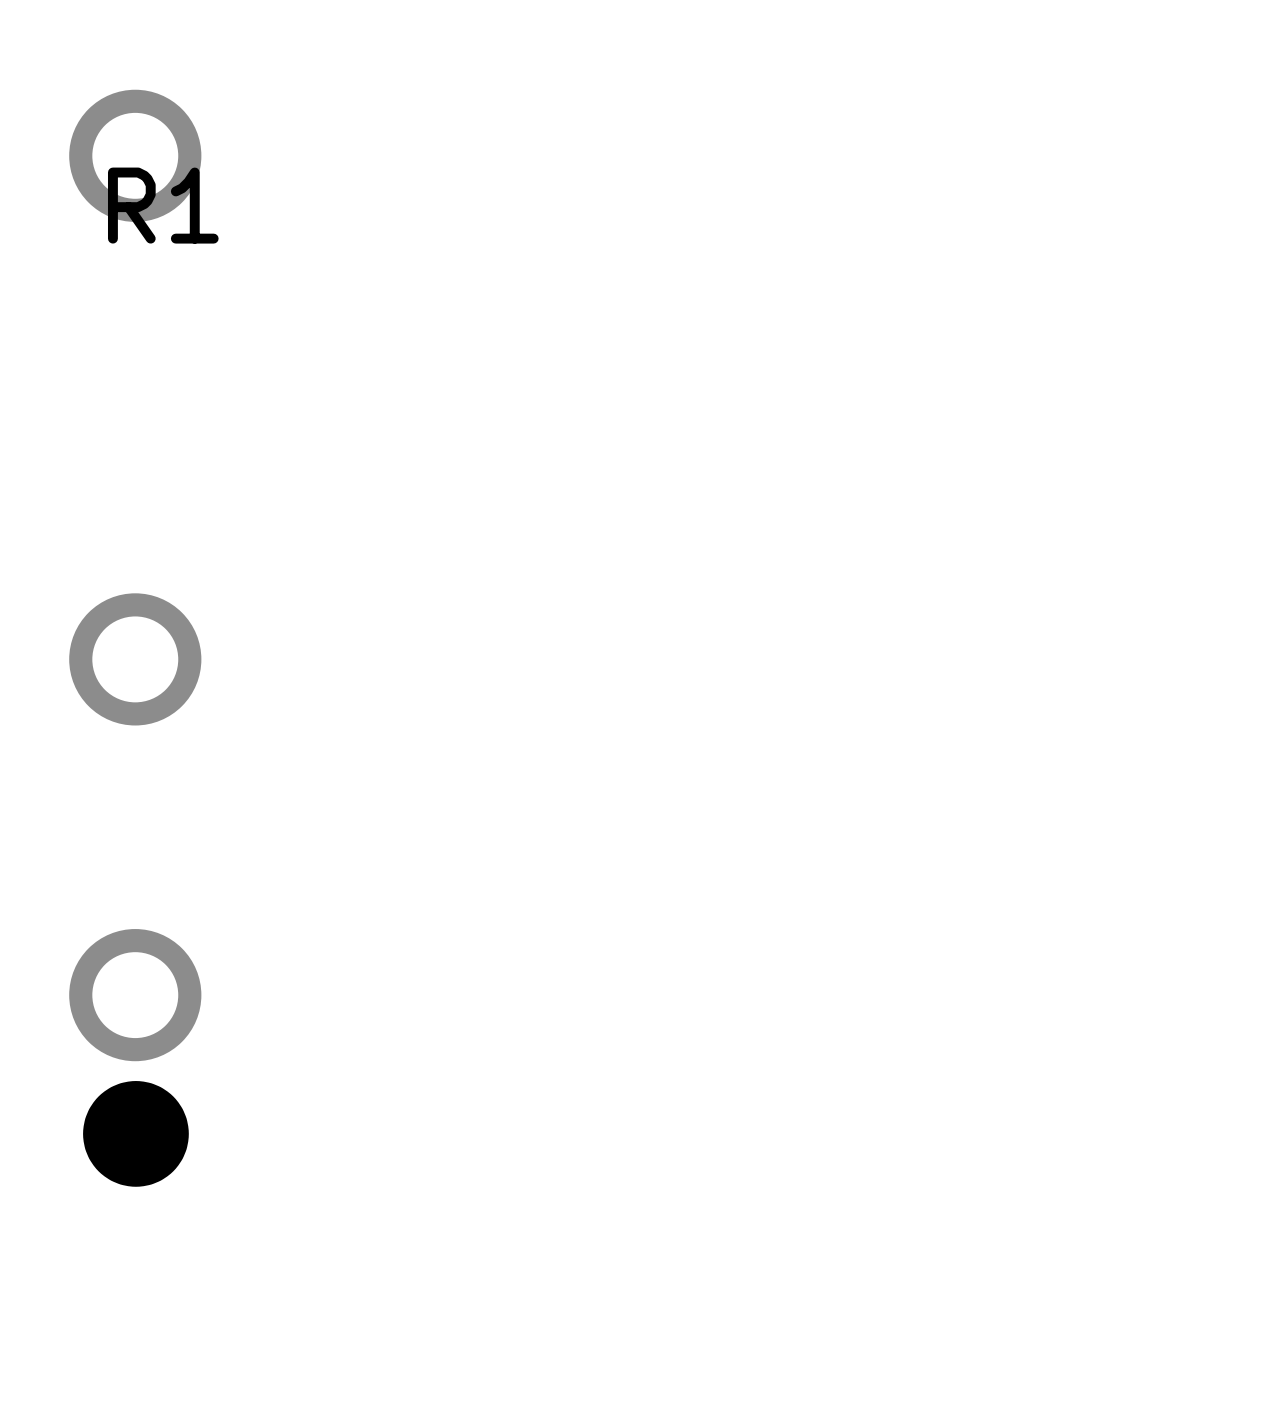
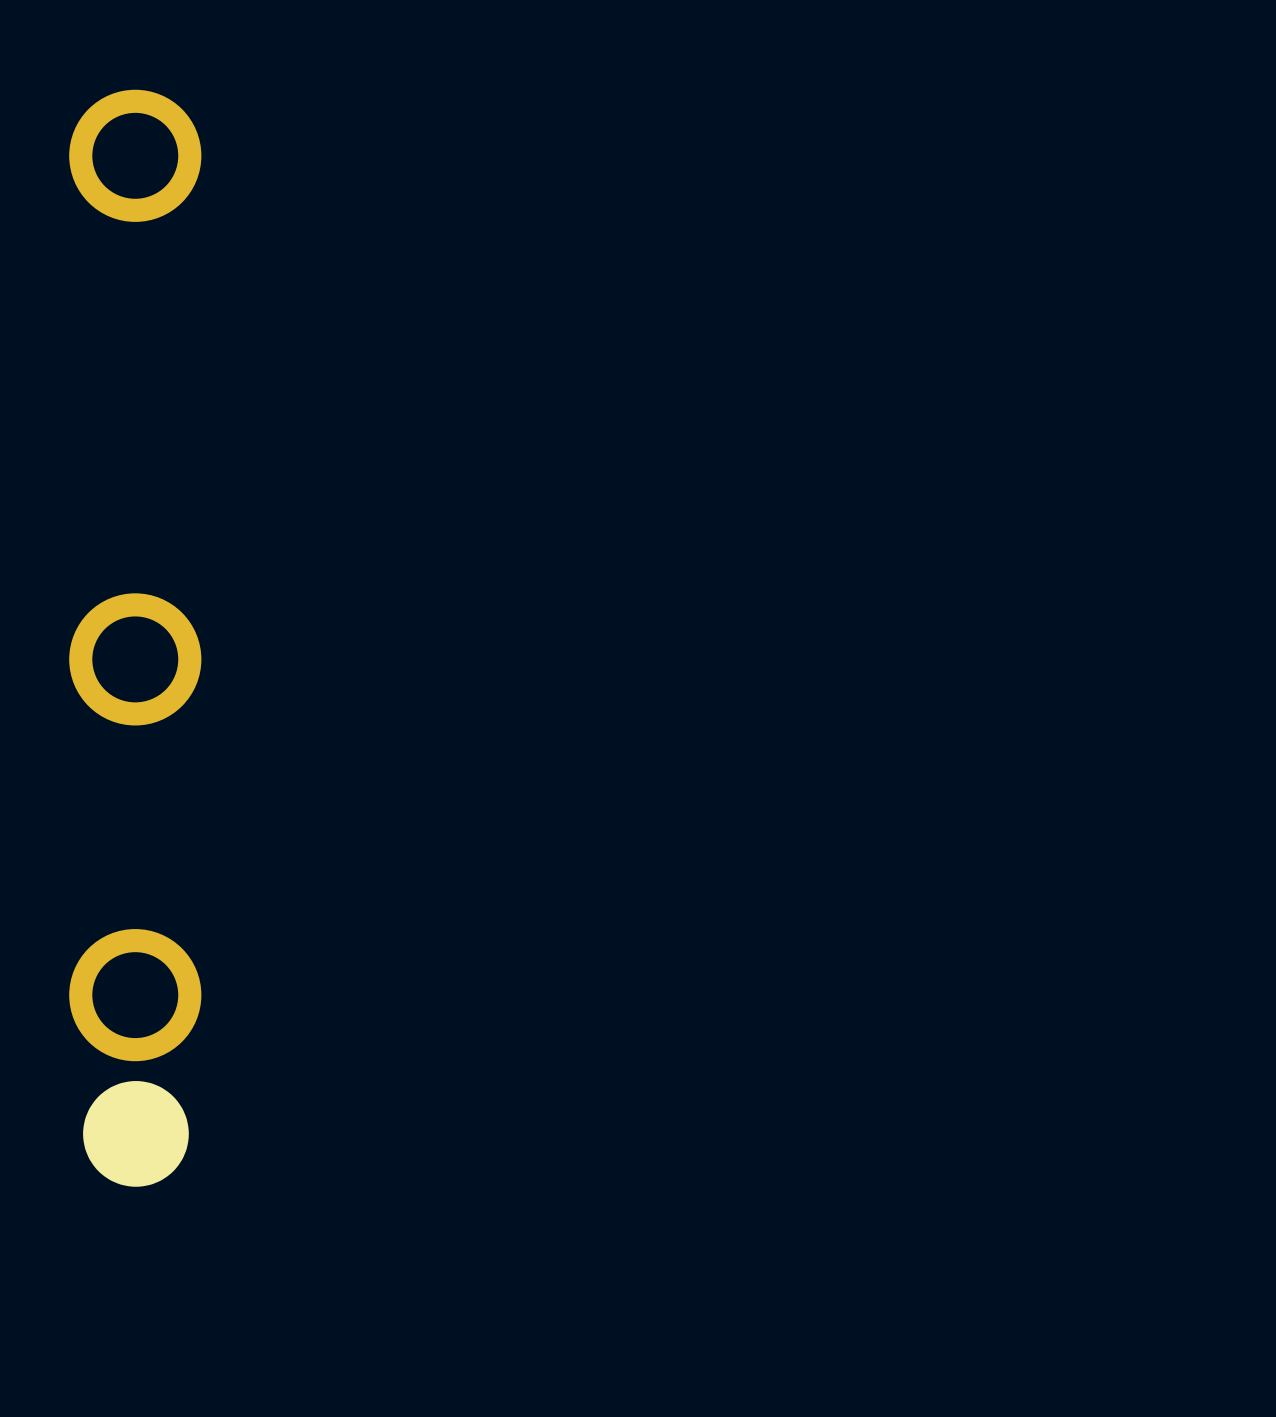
R1 name: R1 (163, 205) -> none

